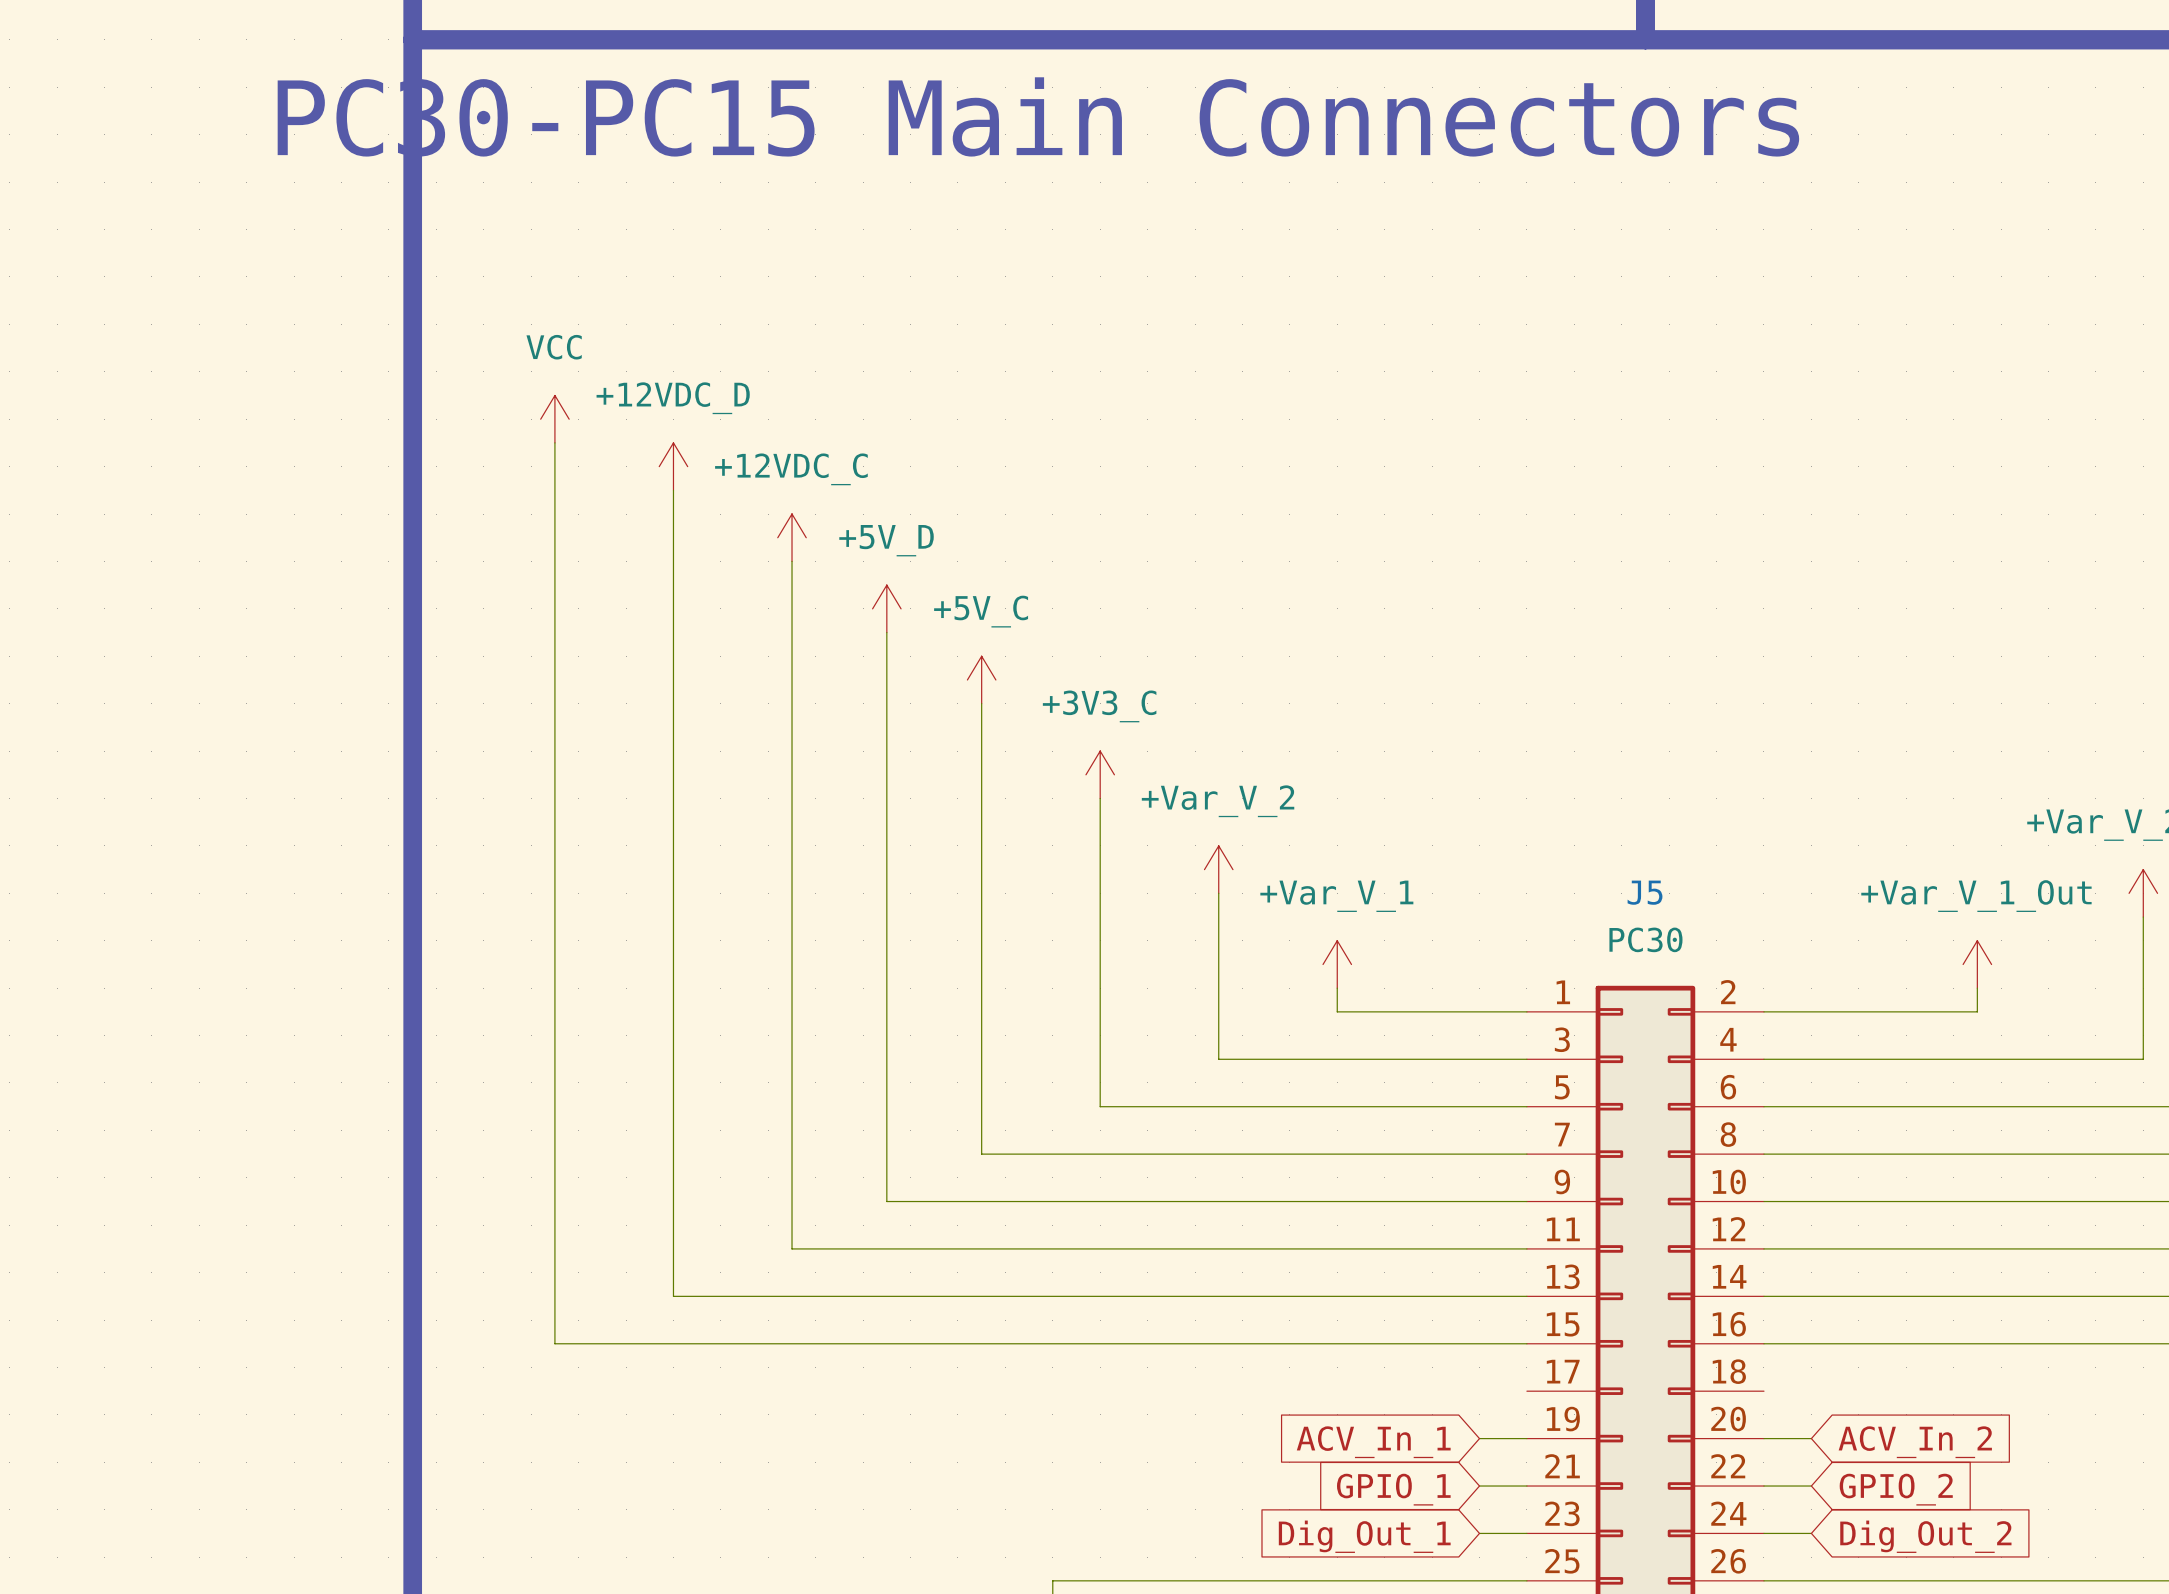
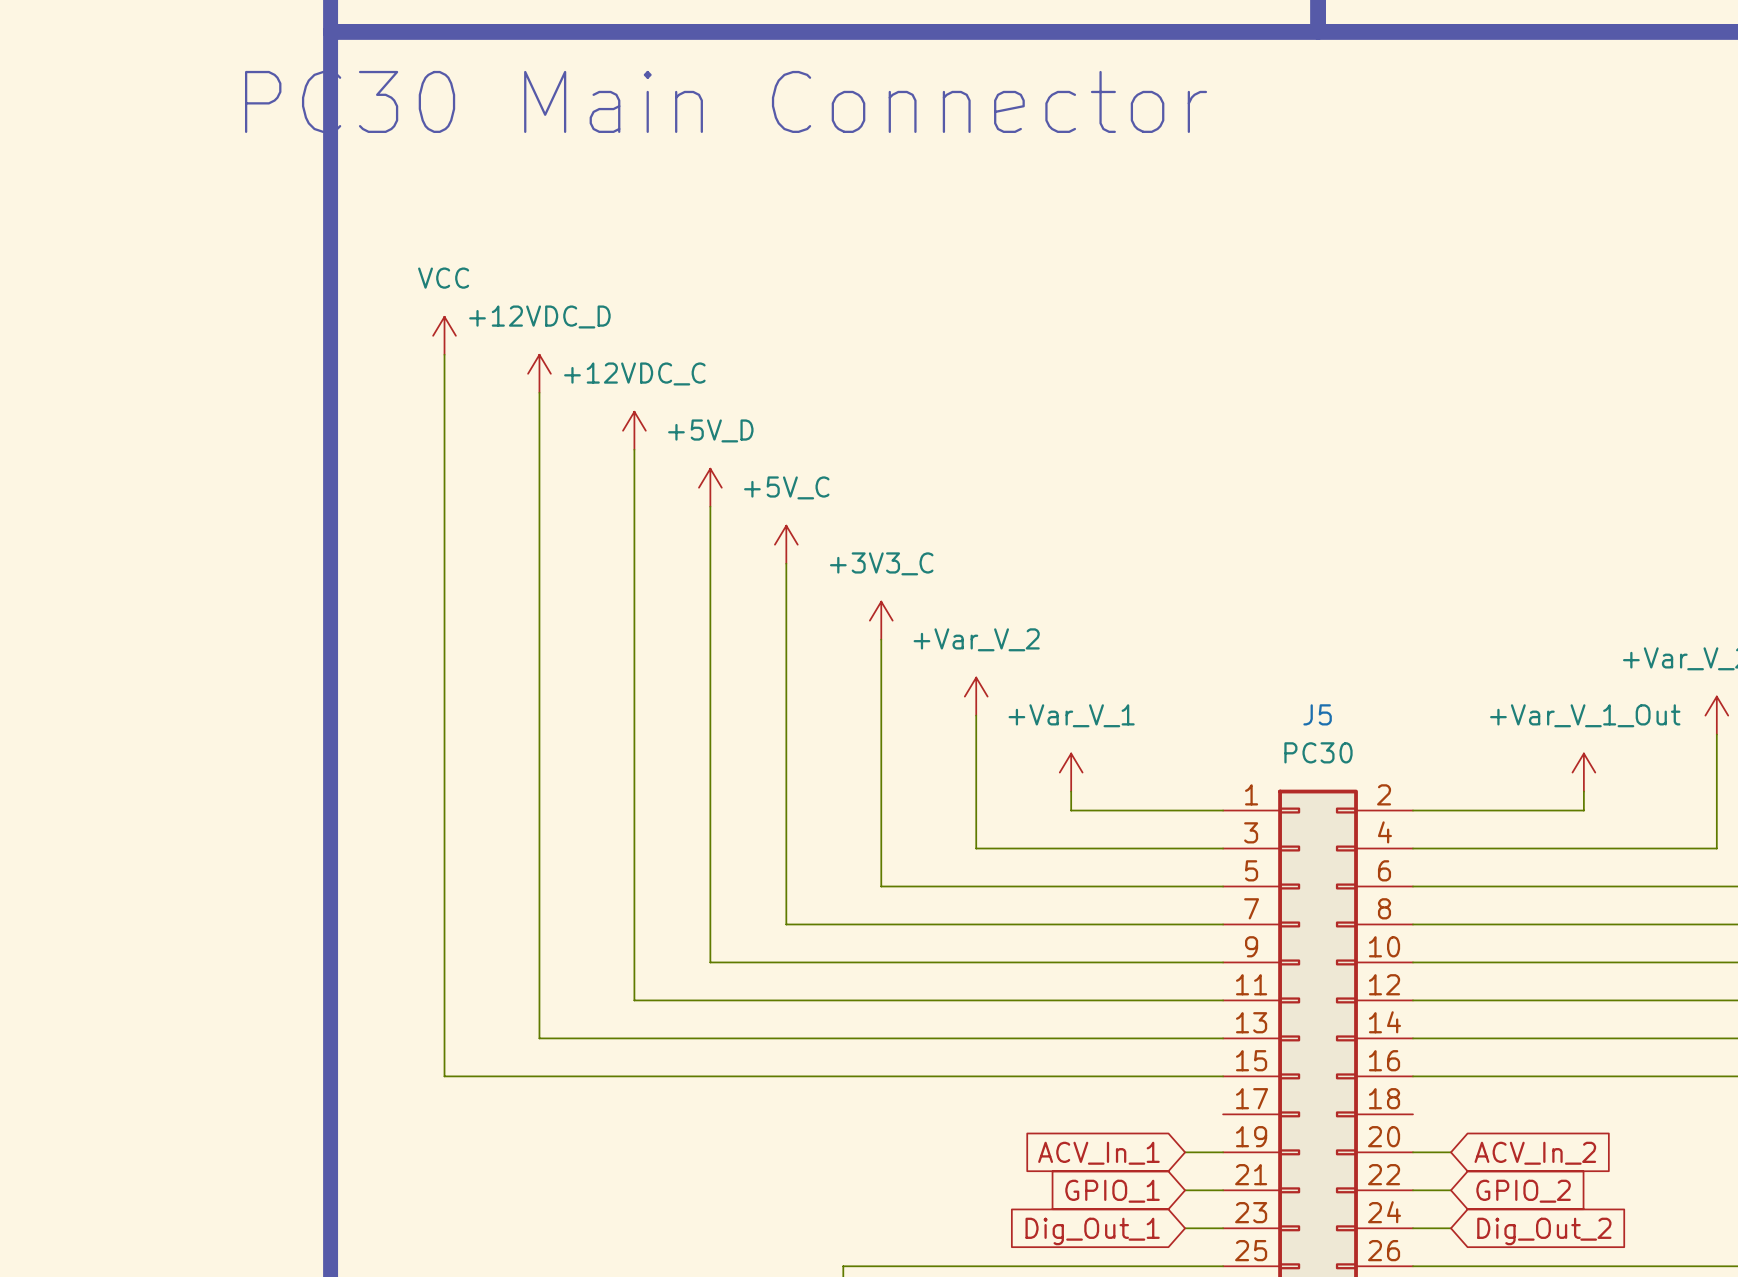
text: PC30-PC15 Main Connectors (1038, 116) -> PC30 Main Connector (726, 101)

